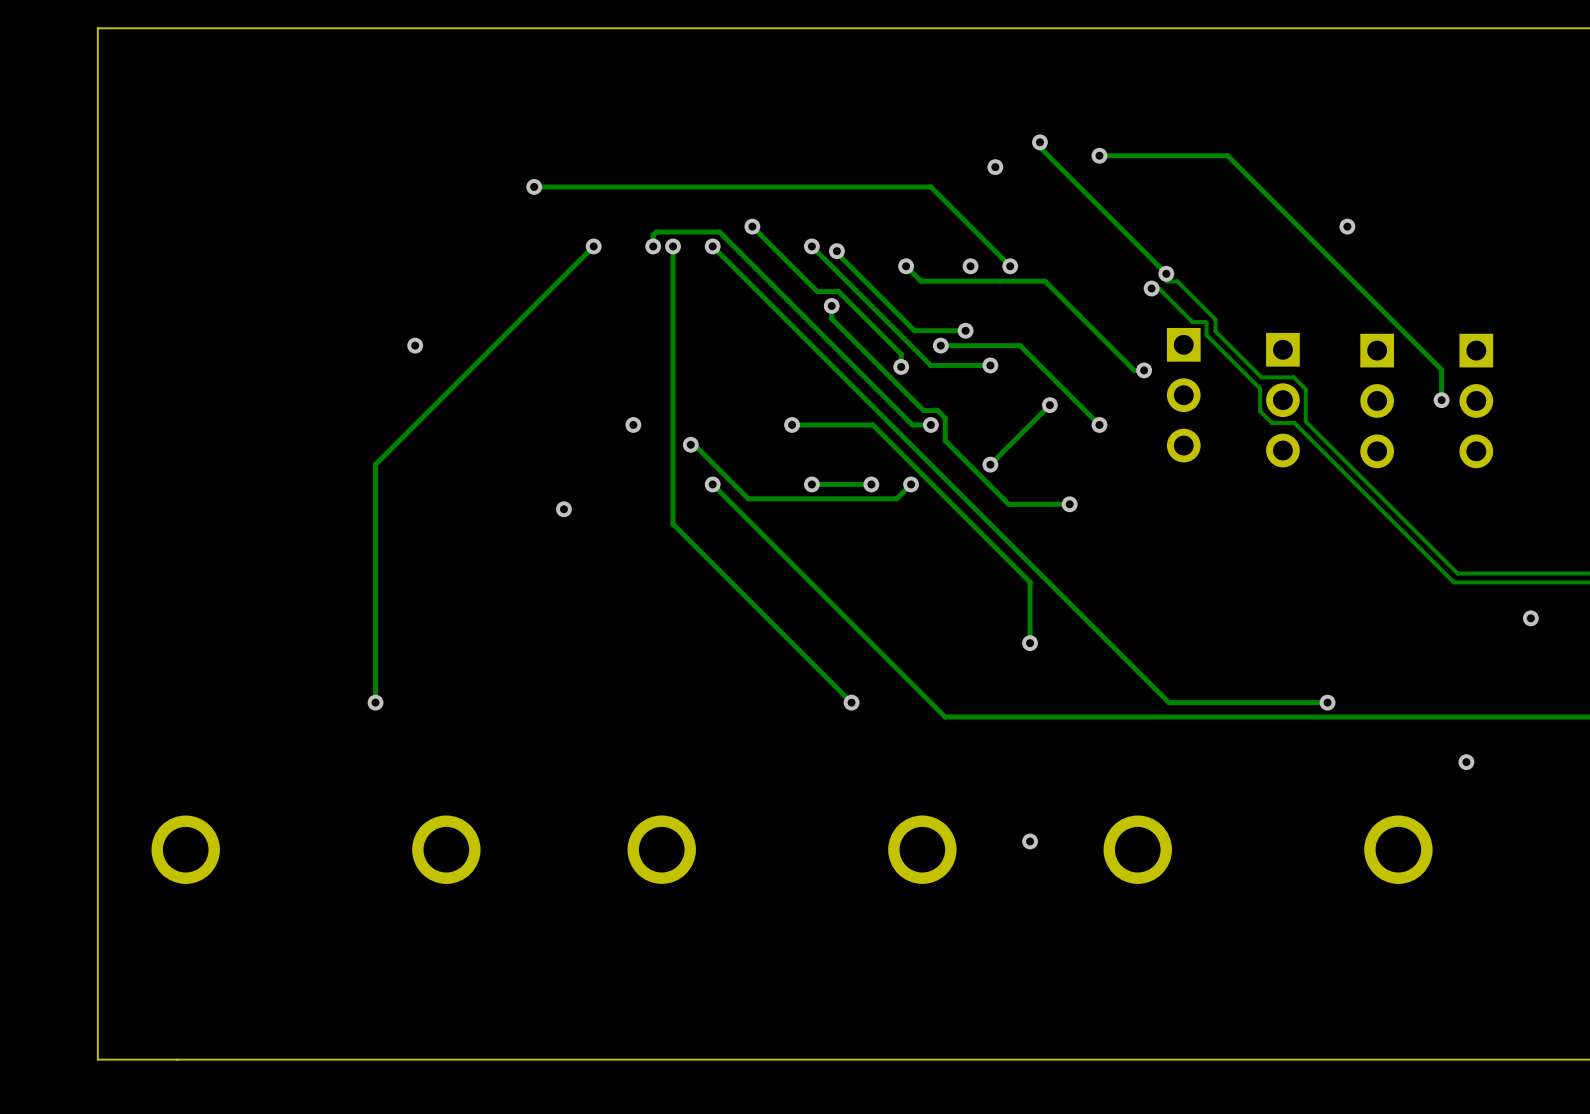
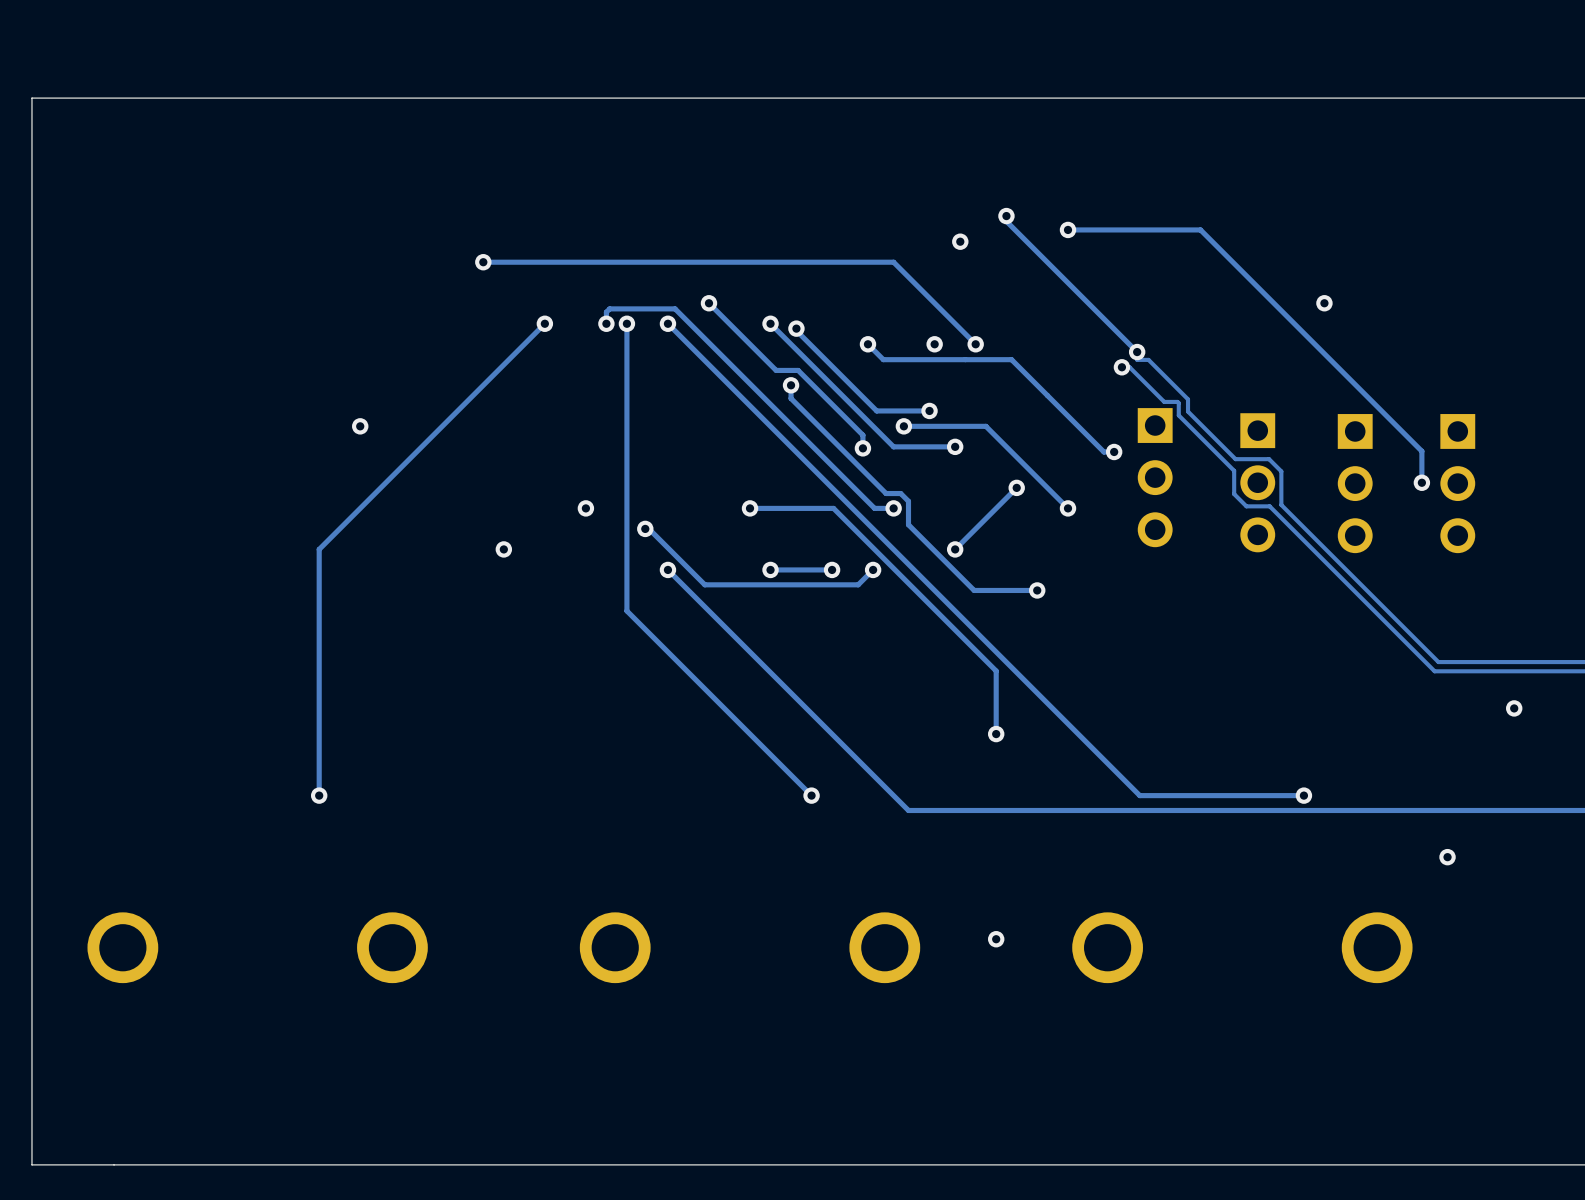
via position: (563, 509) -> (503, 549)

